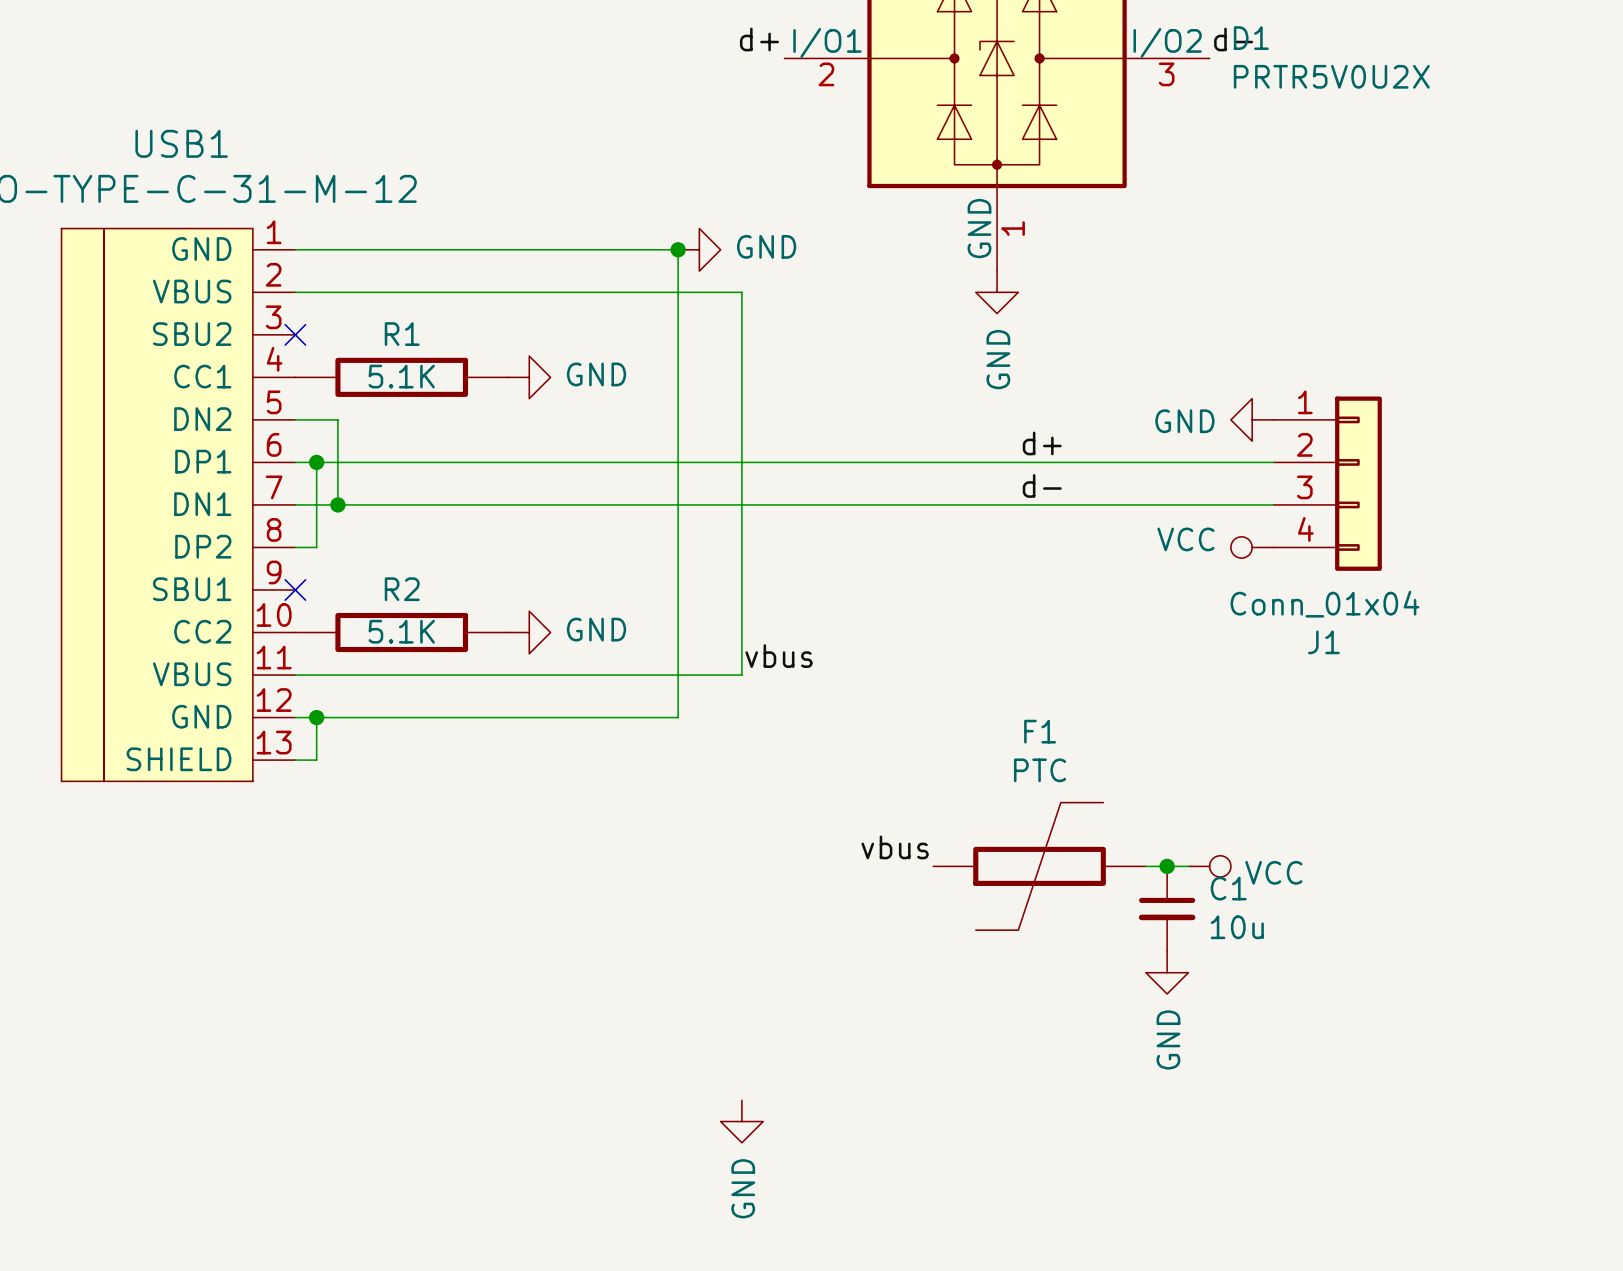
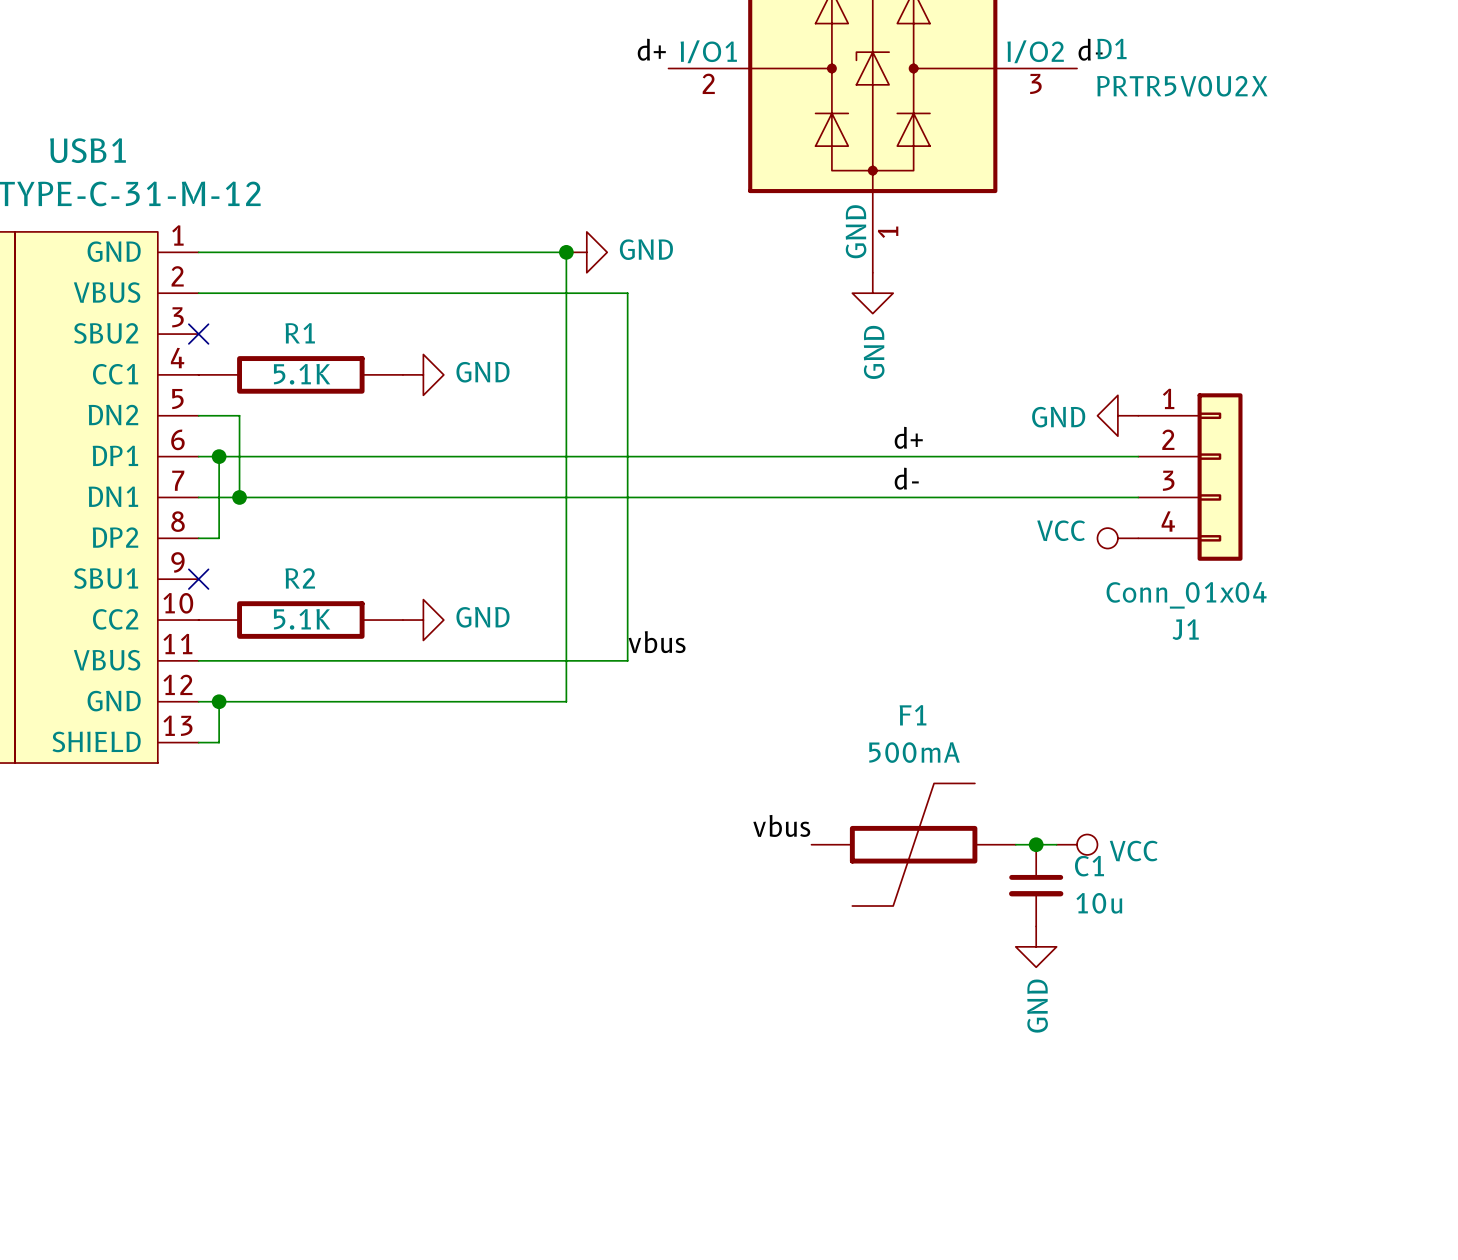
F1 value: PTC (1040, 770) -> 500mA (914, 752)
power symbol: GND (741, 1121) -> none

